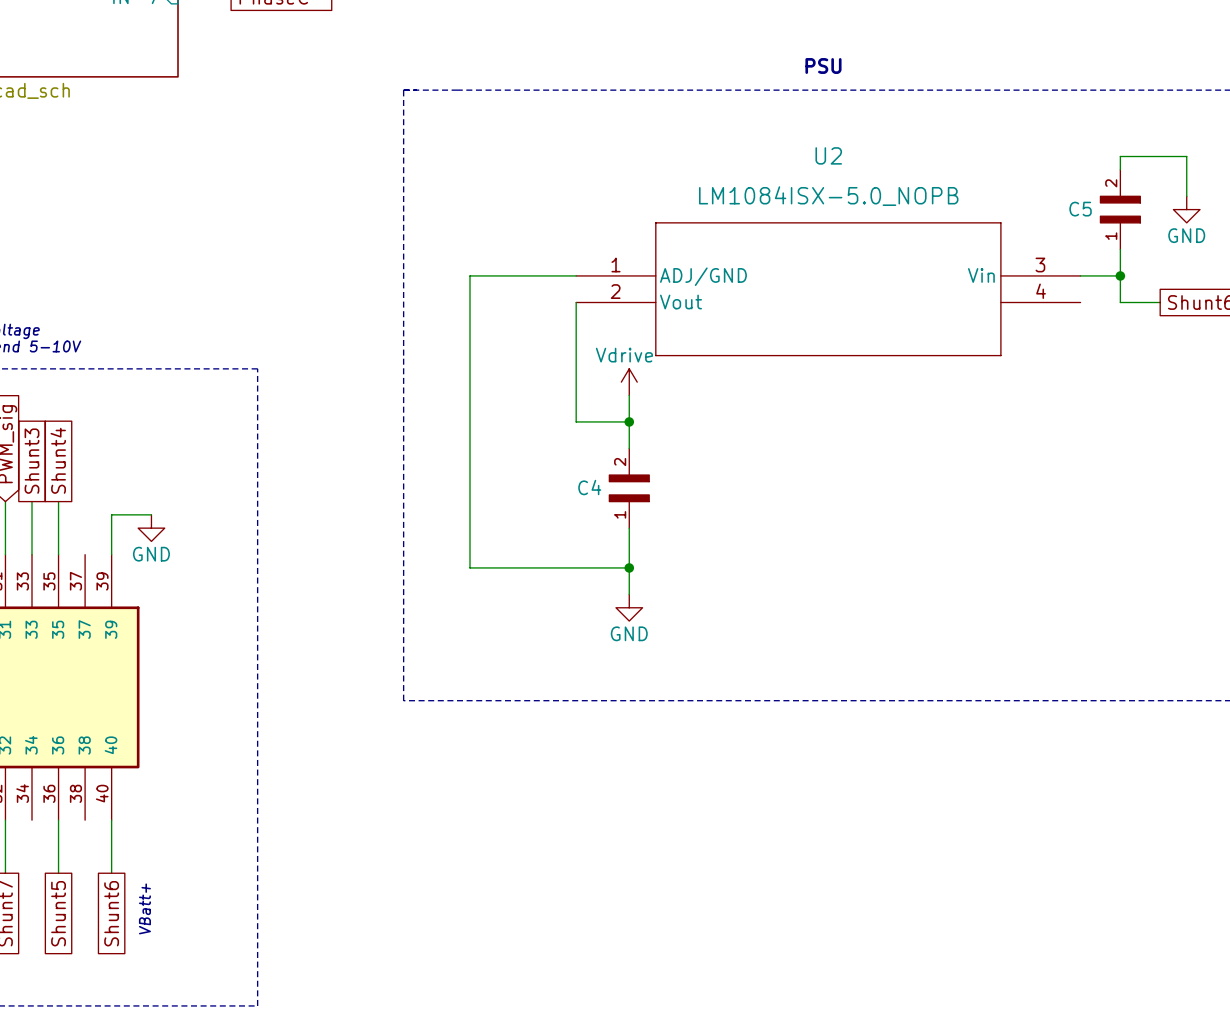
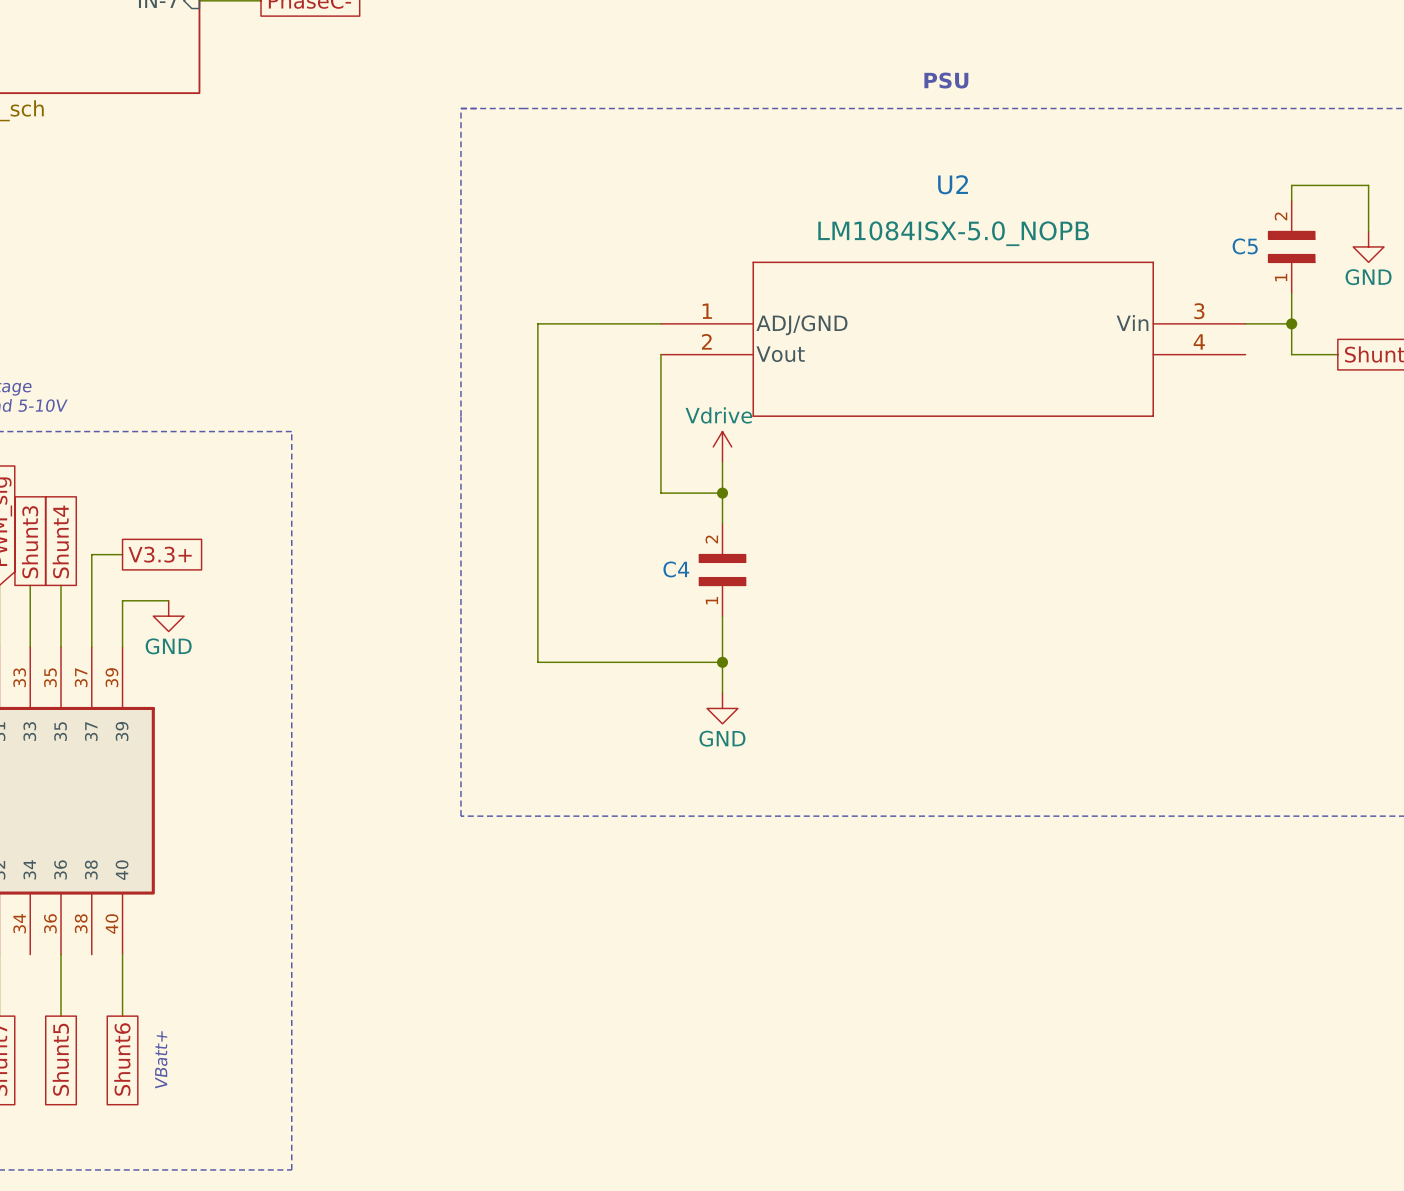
wire: none -> (122, 554) (91, 554) (91, 646)
global label: none -> V3.3+ (160, 554)

